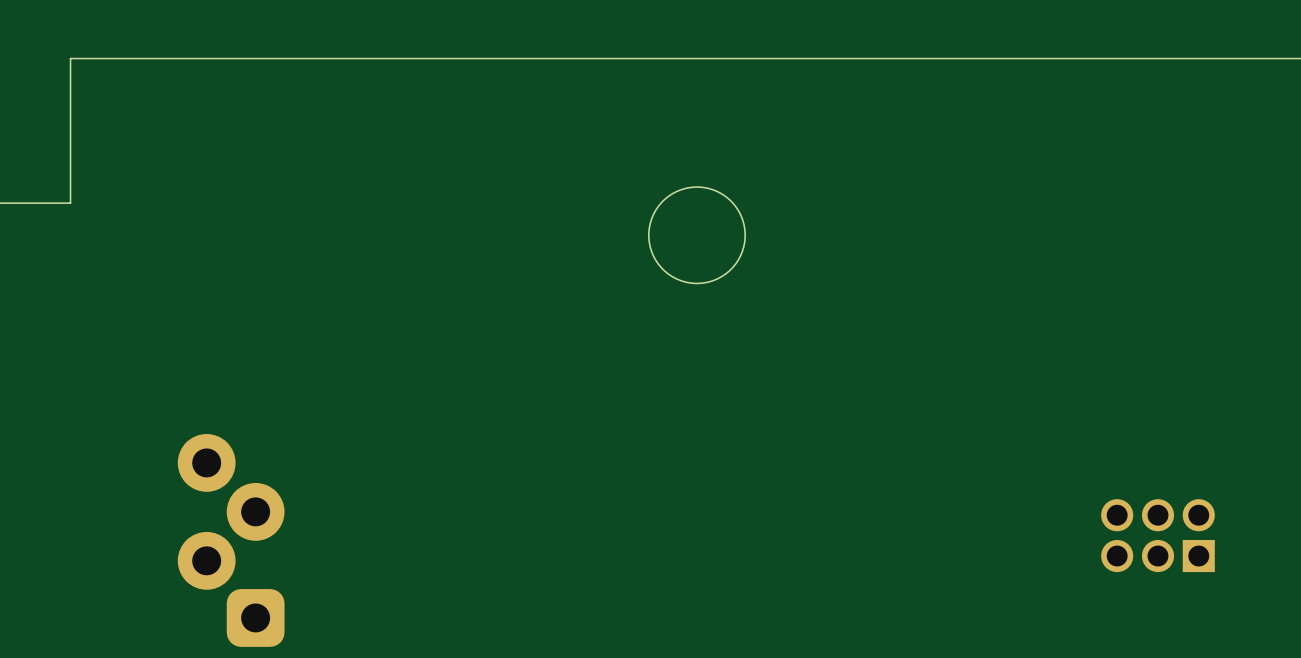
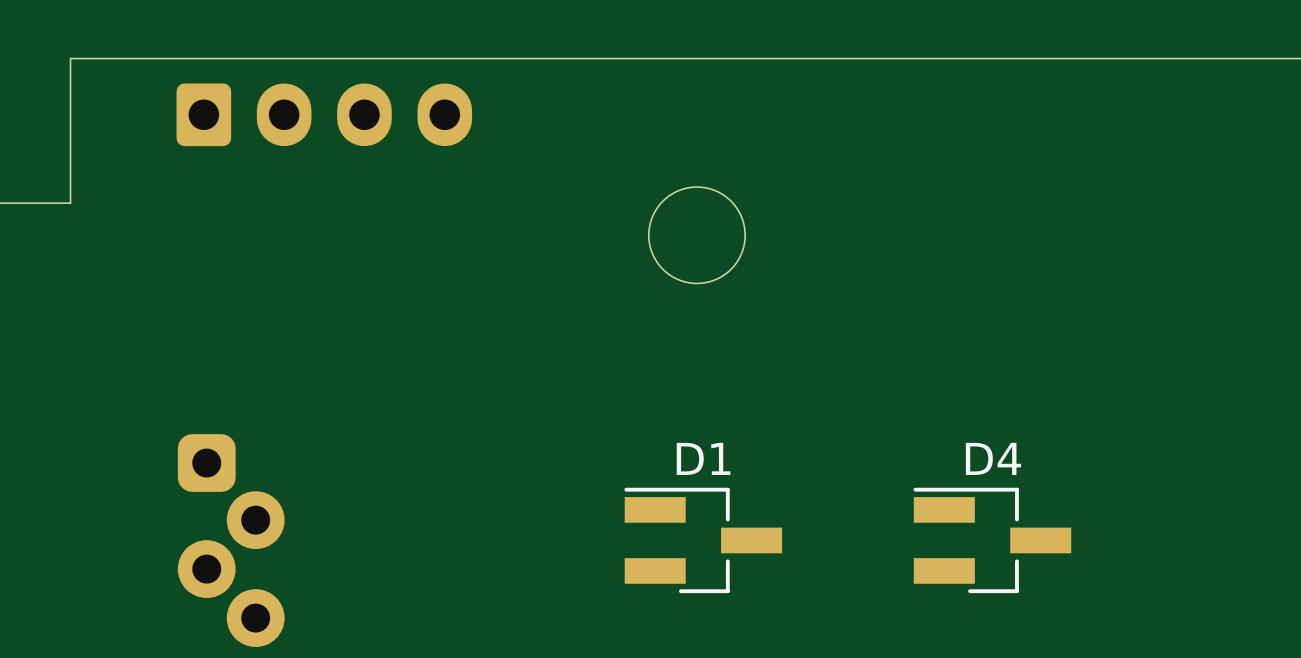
part: none -> (324, 114)
part: (1157, 535) -> none
part rotation: 0° (231, 540) -> 180° (231, 540)
D1: none -> (703, 540)
D4: none -> (992, 540)

